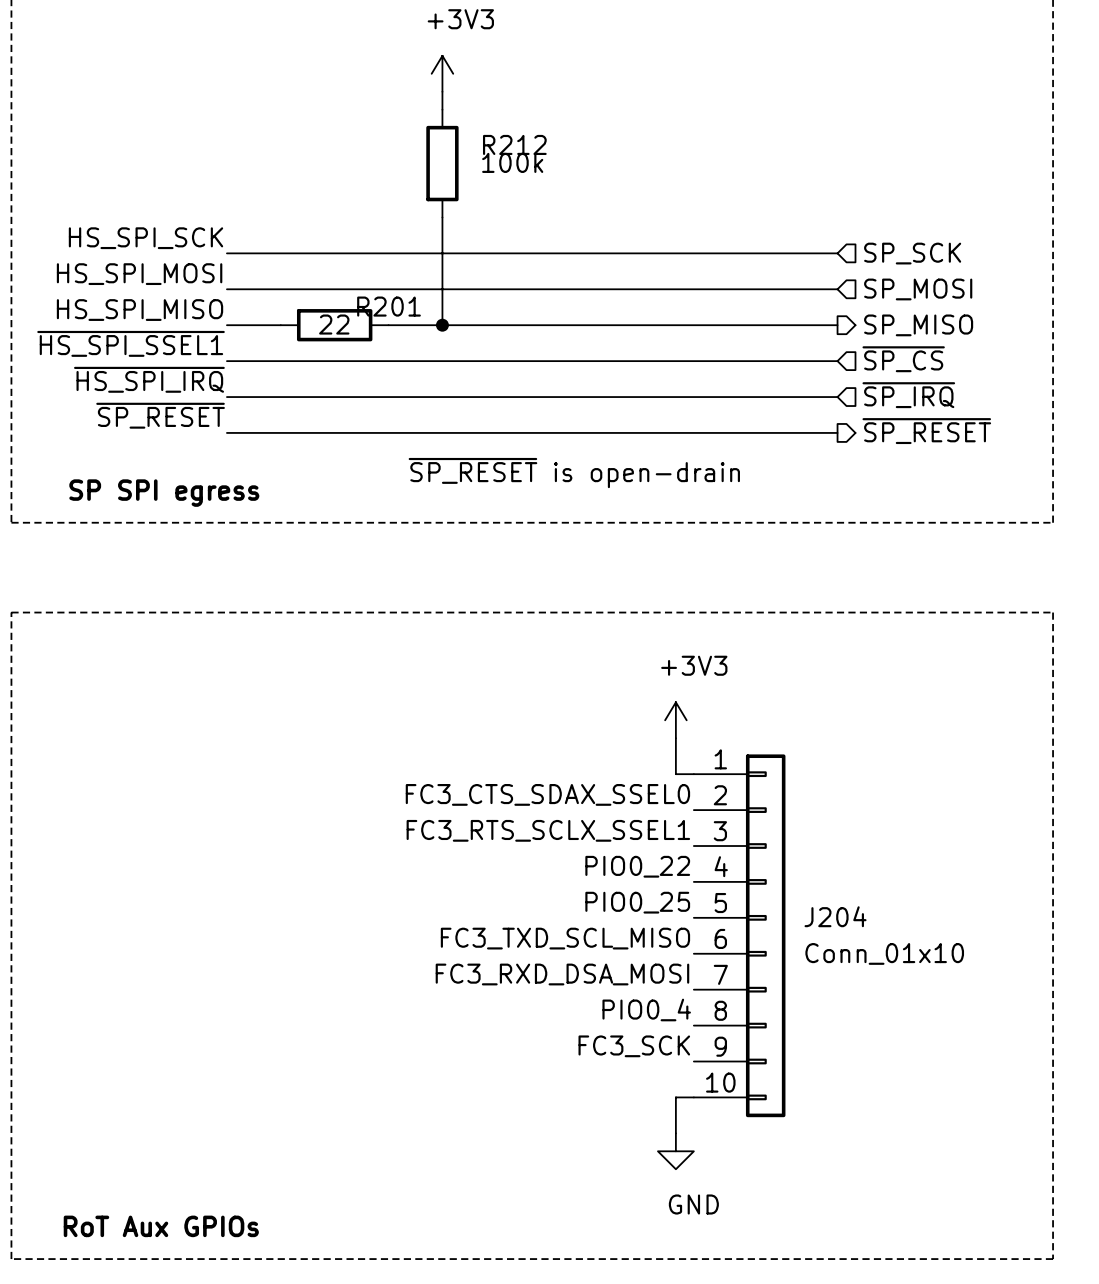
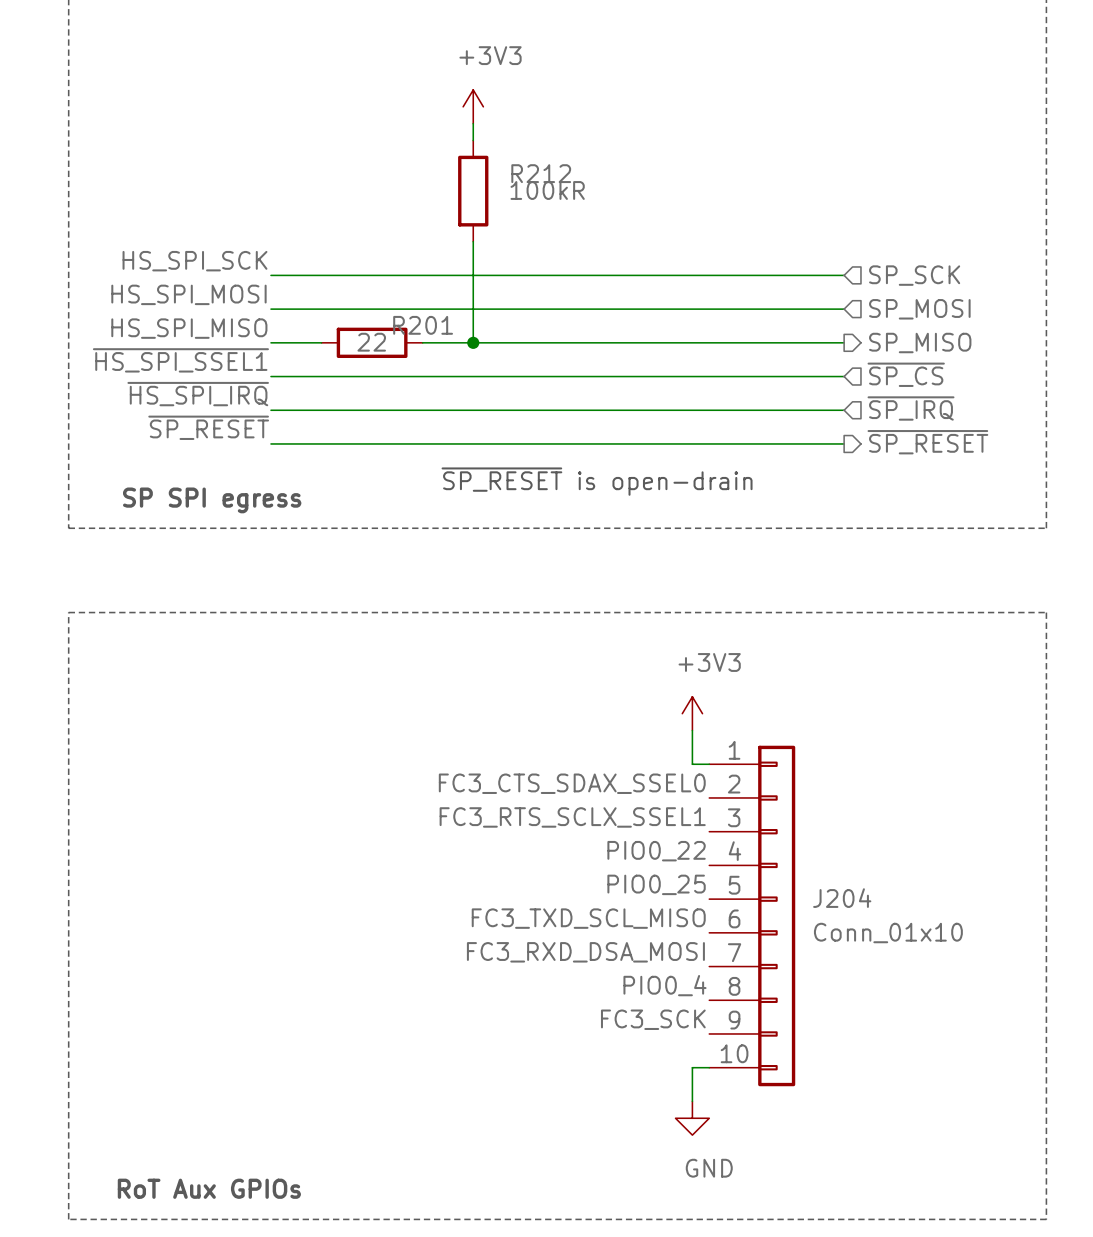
R212 value: 100k (512, 162) -> 100kR (547, 190)

